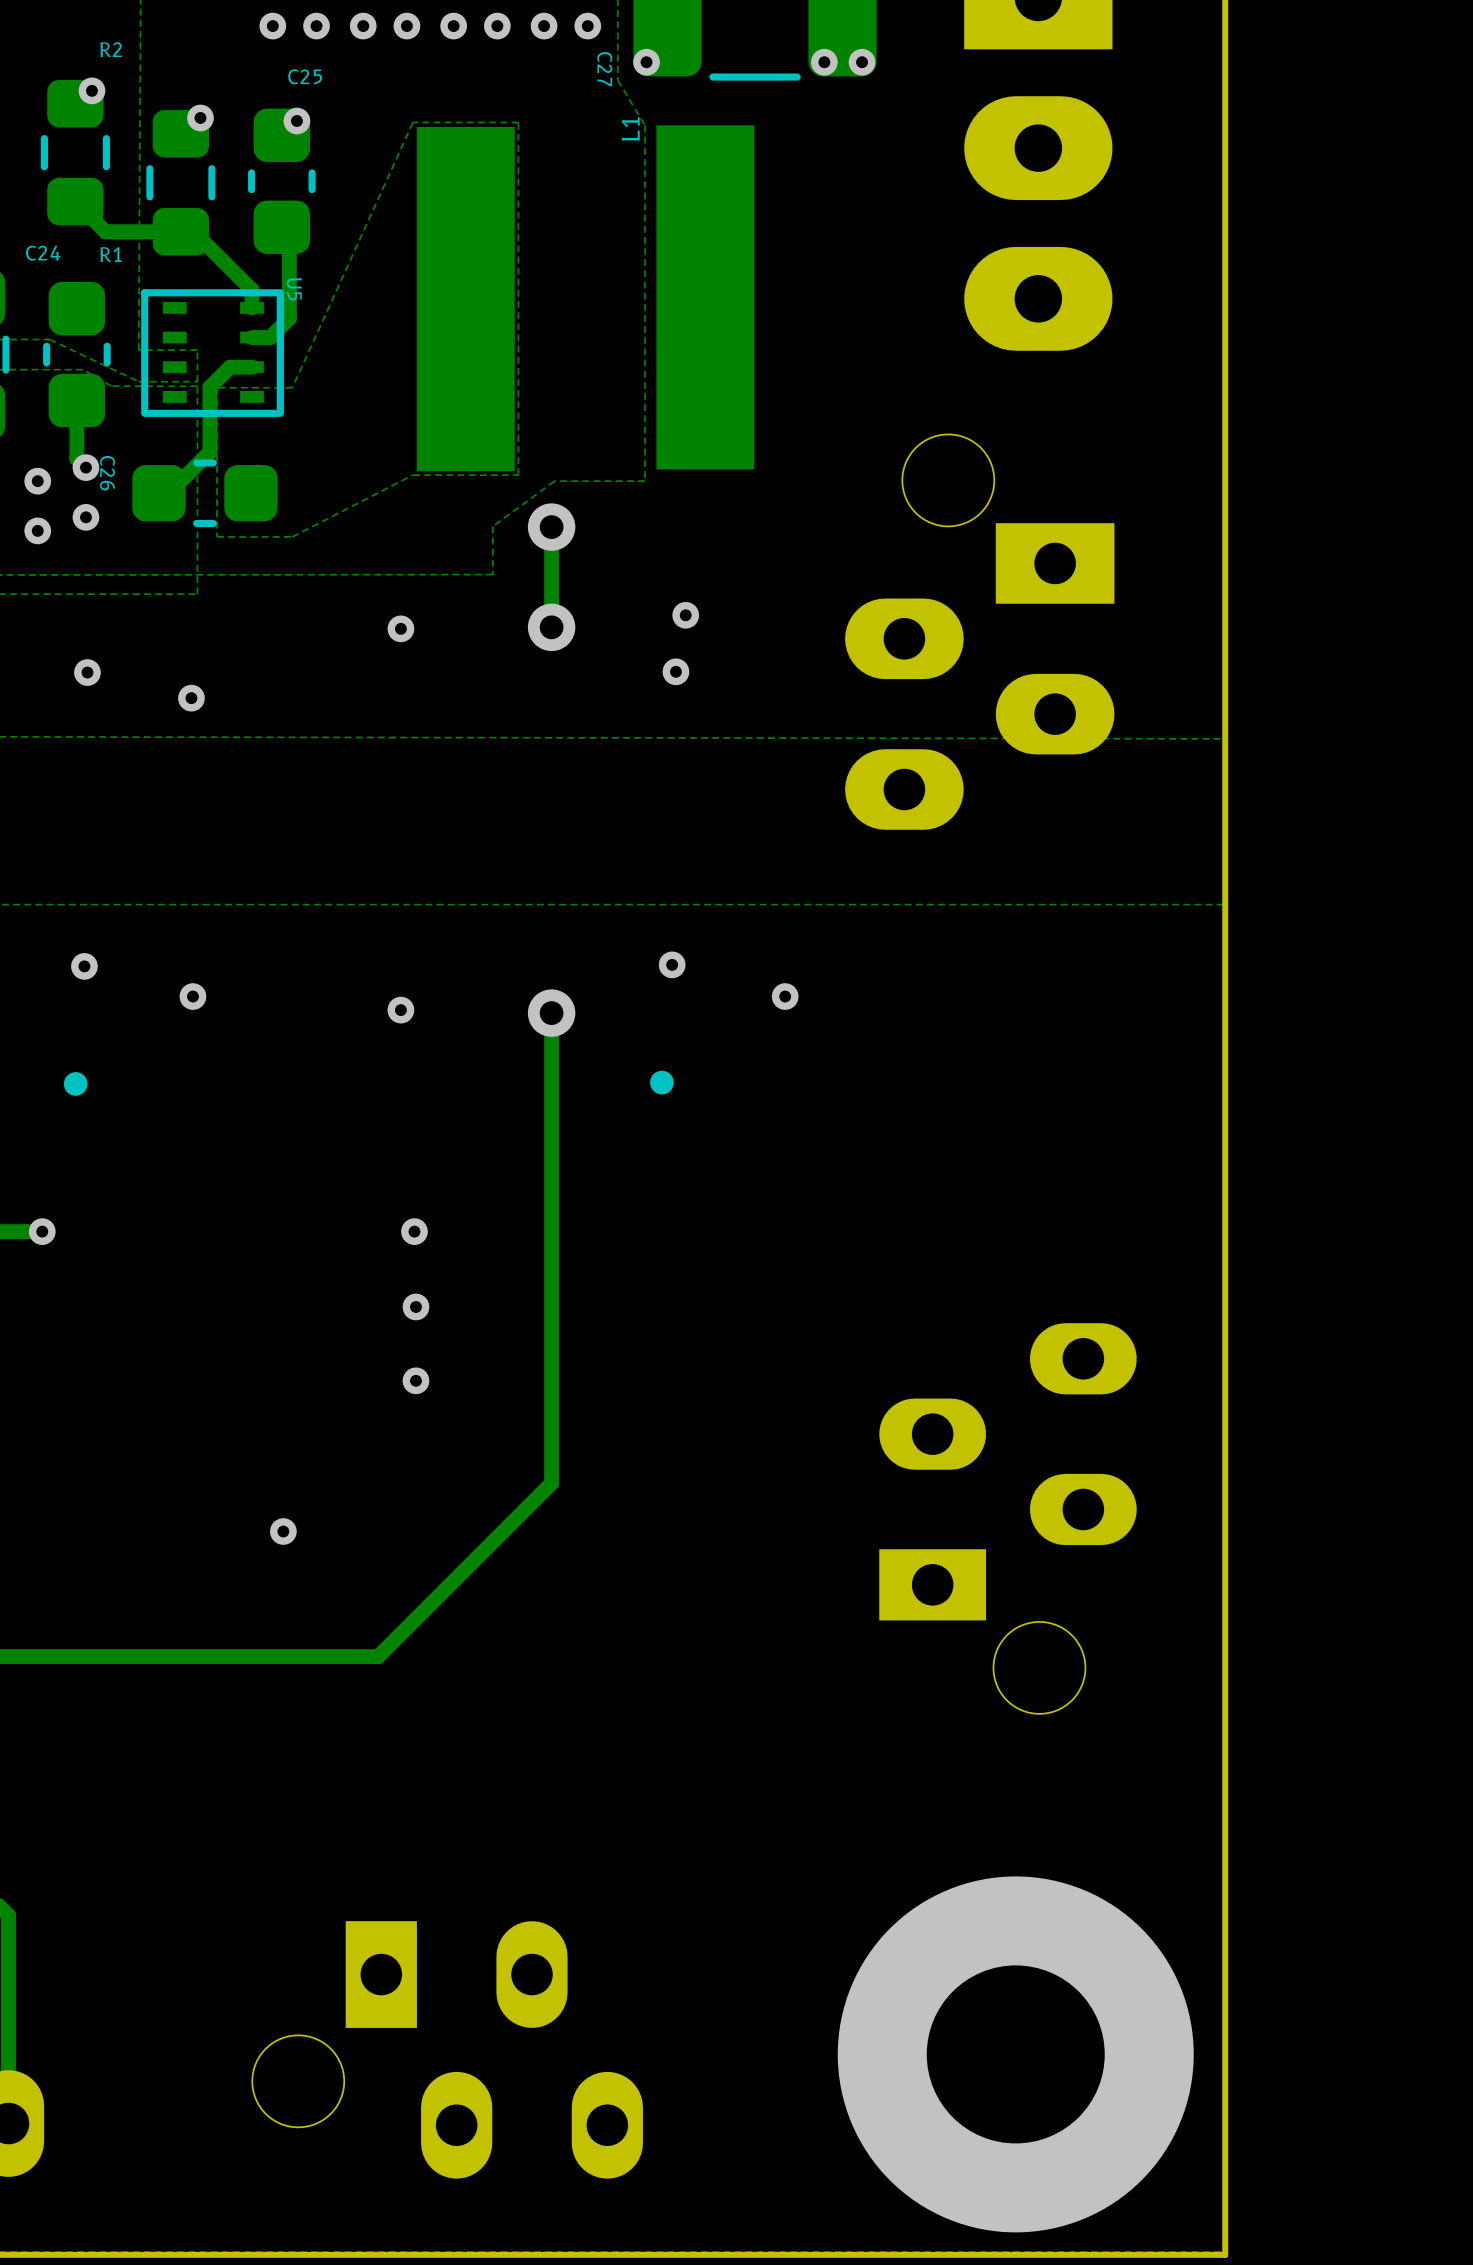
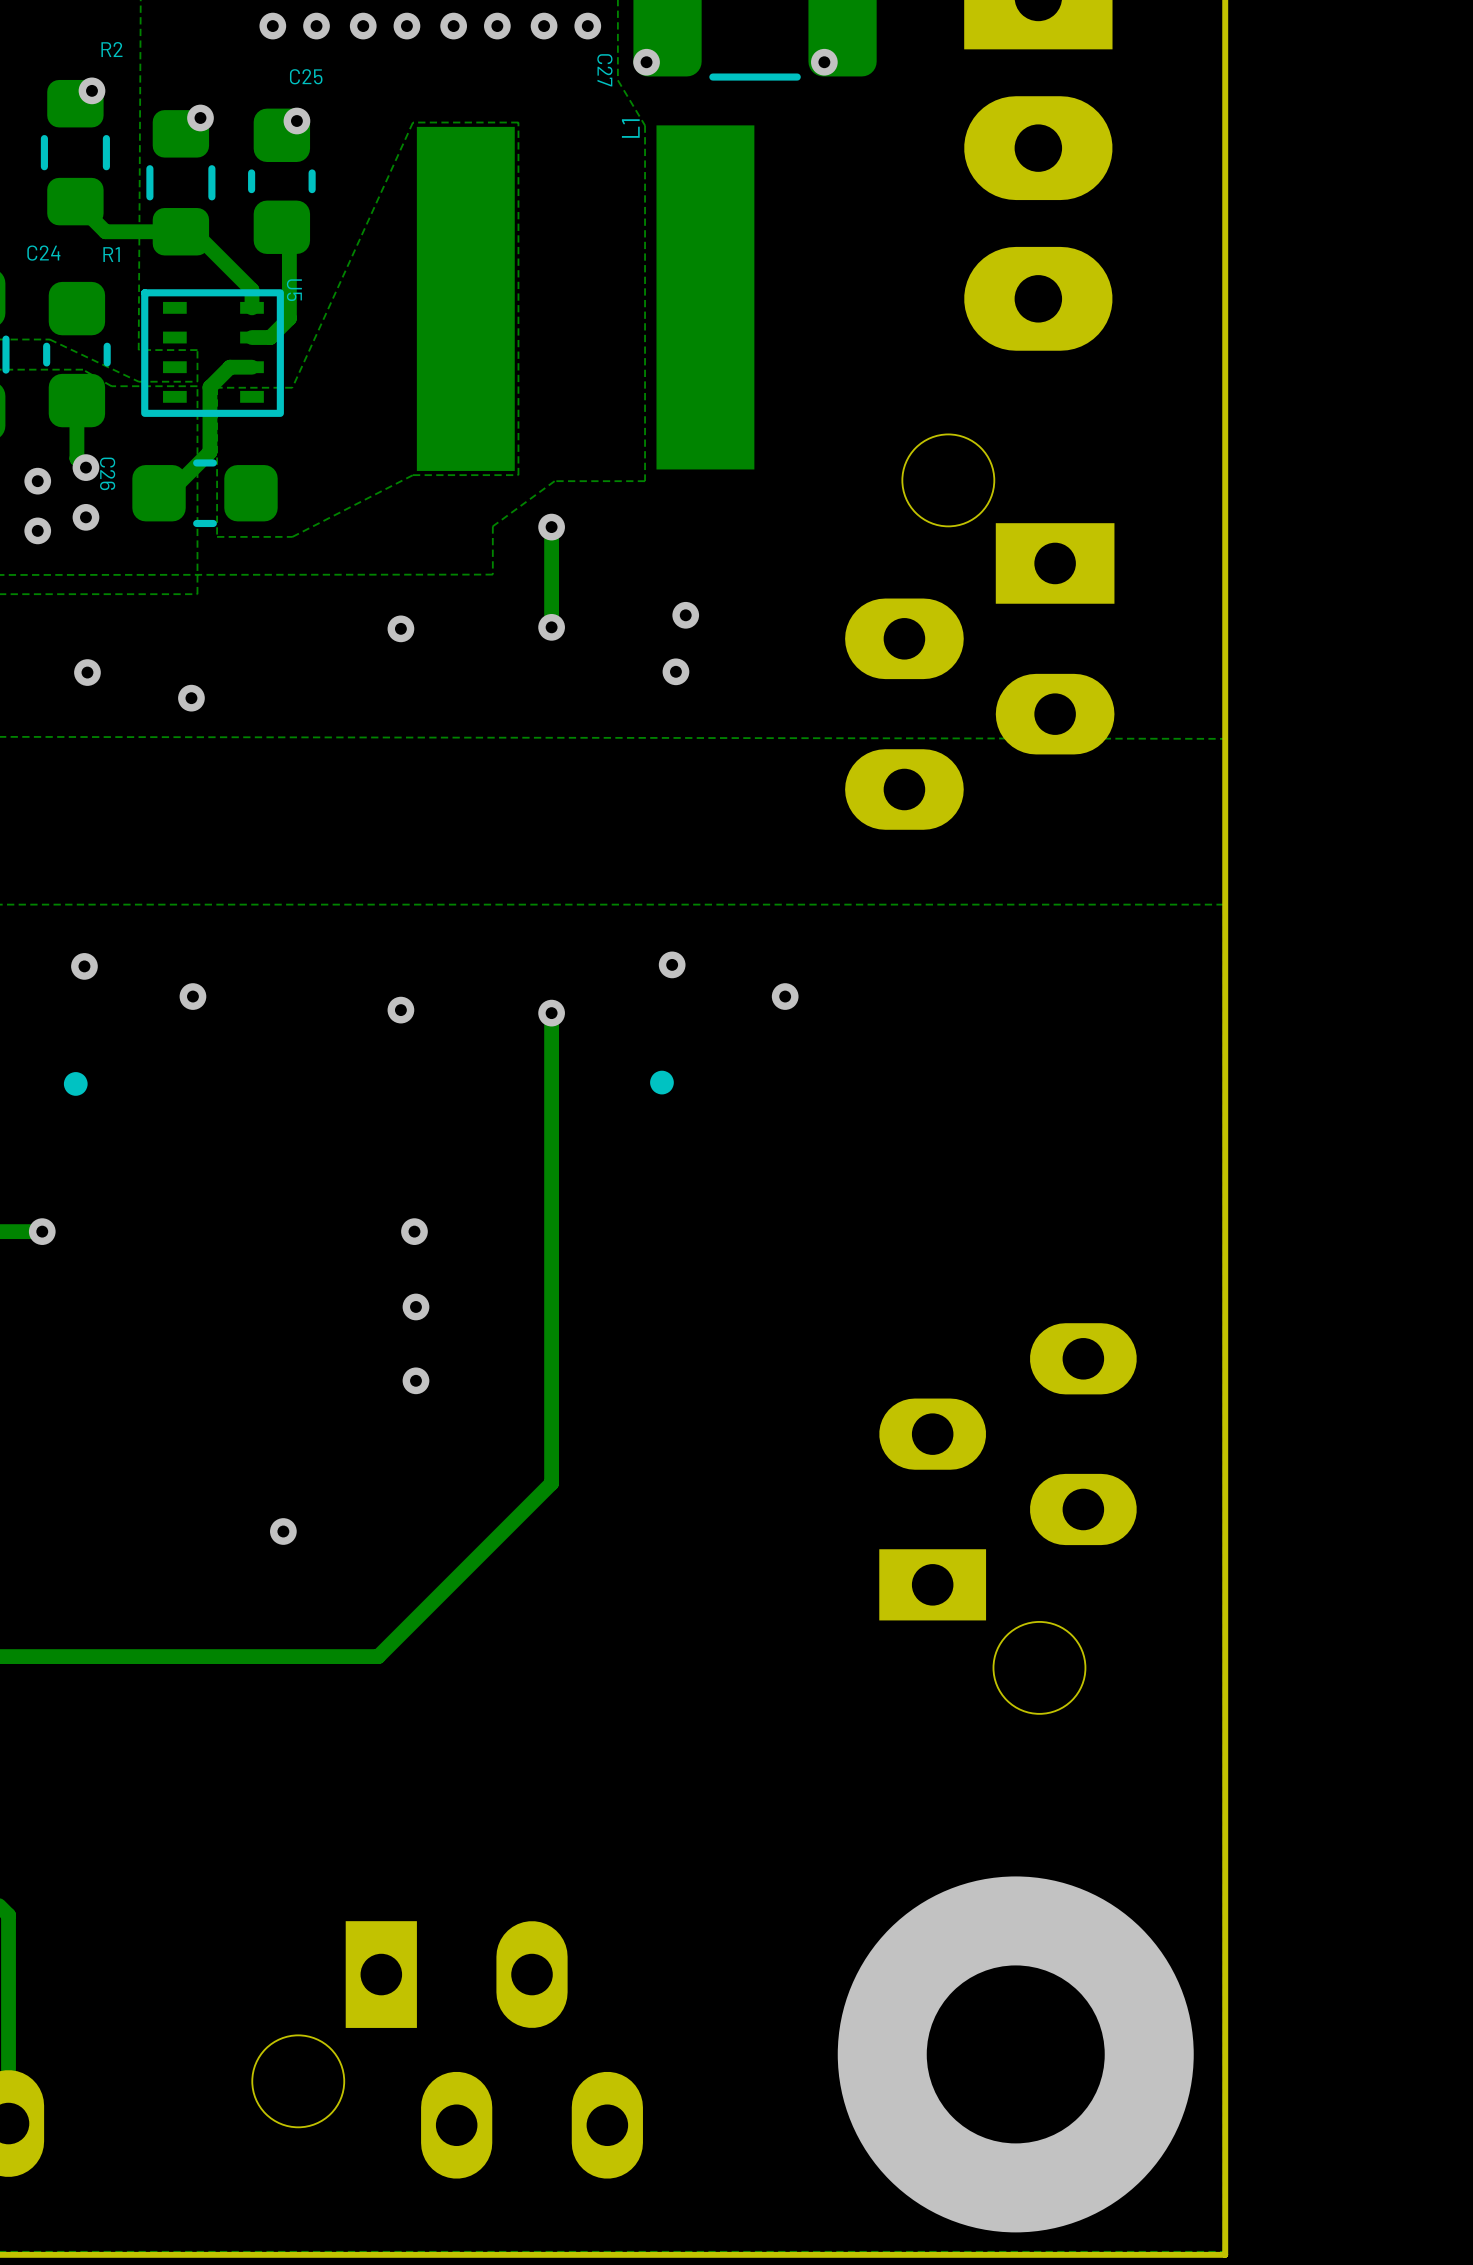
via: (862, 62) -> none
via size: [527, 503, 576, 551] -> [538, 513, 565, 541]
via size: [527, 603, 576, 652] -> [538, 613, 565, 641]
via size: [527, 989, 576, 1037] -> [538, 999, 565, 1027]

